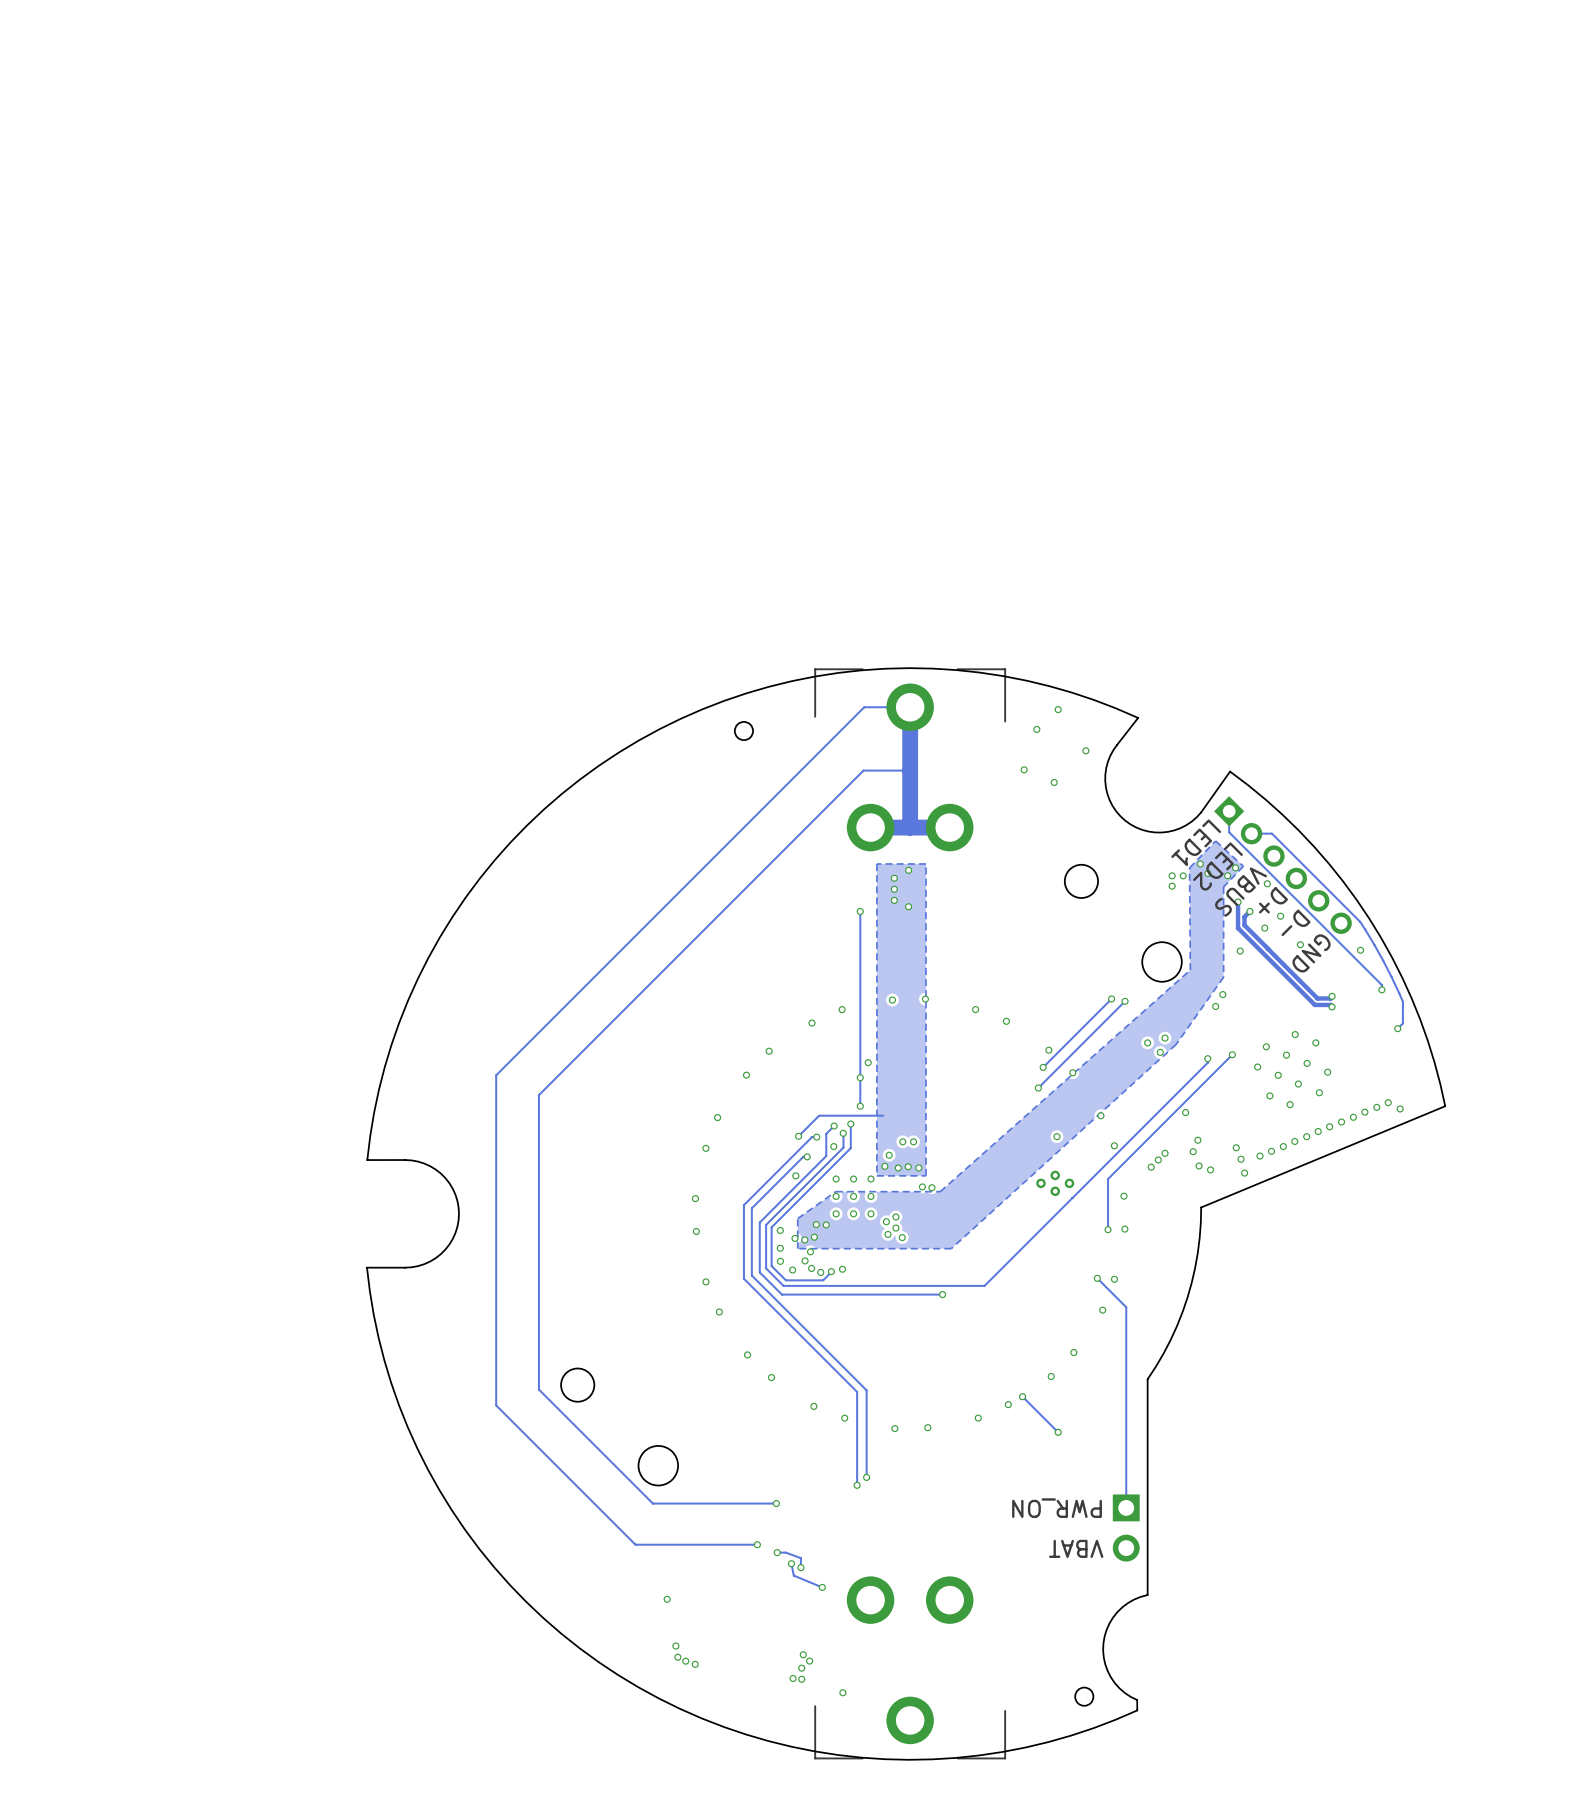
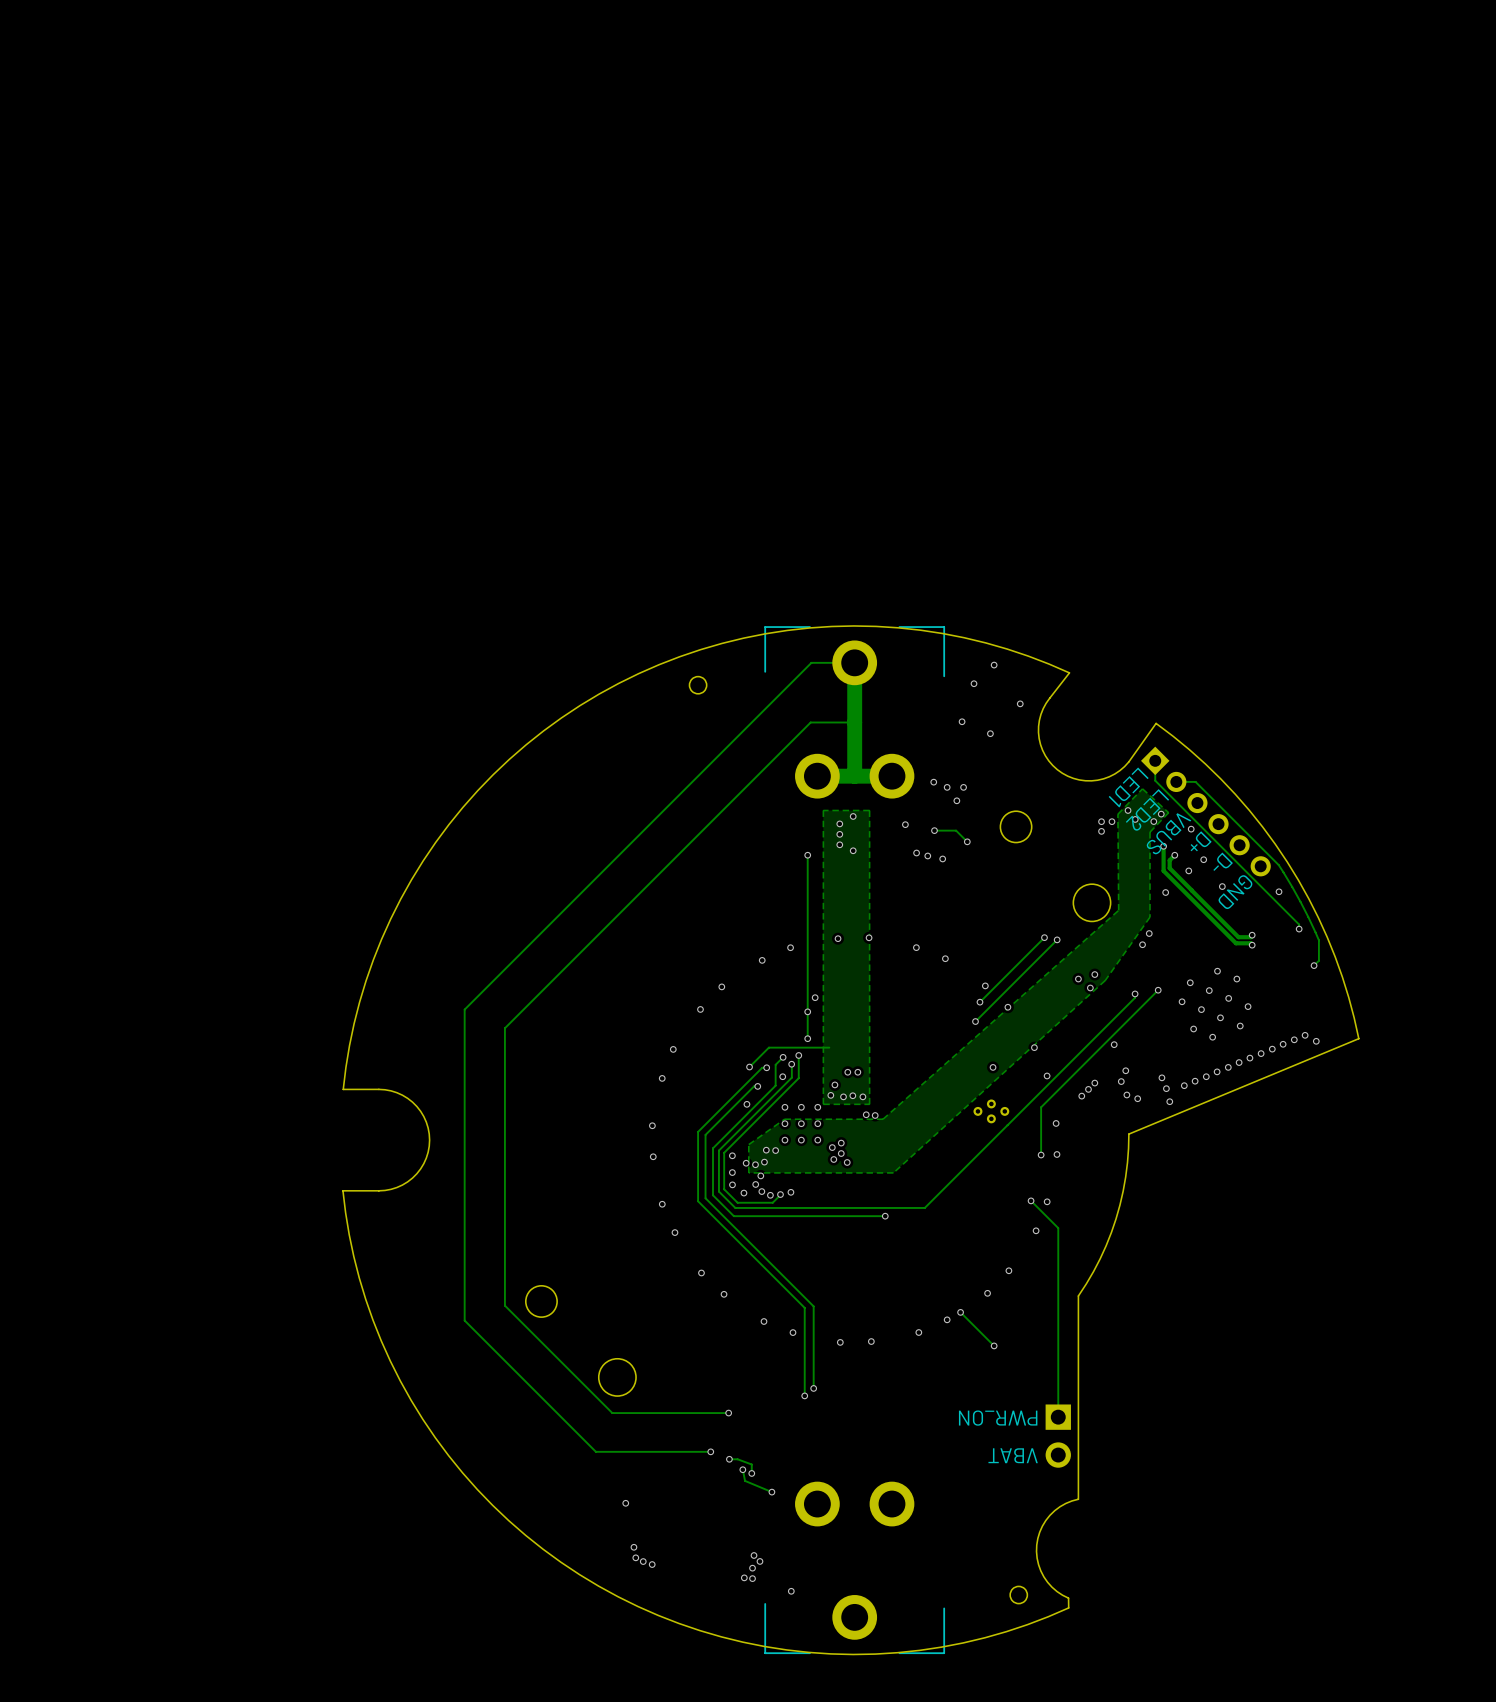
via: none -> (933, 782)
via: none -> (947, 787)
via: none -> (963, 787)
via: none -> (956, 800)
via: none -> (905, 824)
track: none -> (934, 830) (956, 830) (967, 841)
via: none -> (934, 830)
via: none -> (967, 841)
via: none -> (916, 853)
via: none -> (927, 855)
via: none -> (942, 858)

